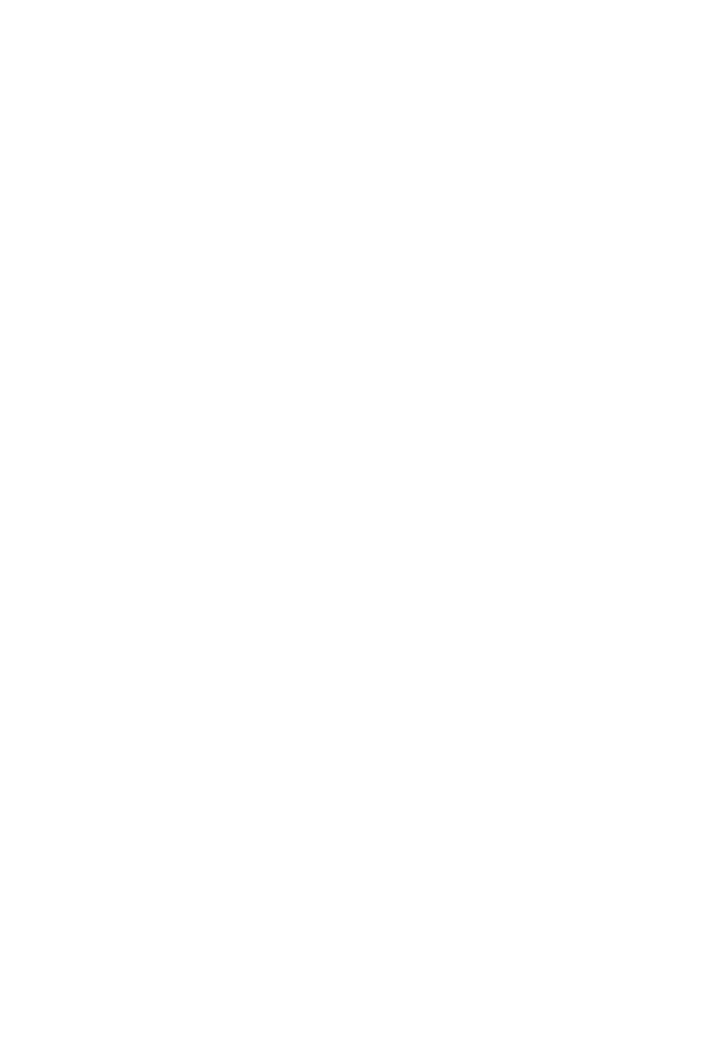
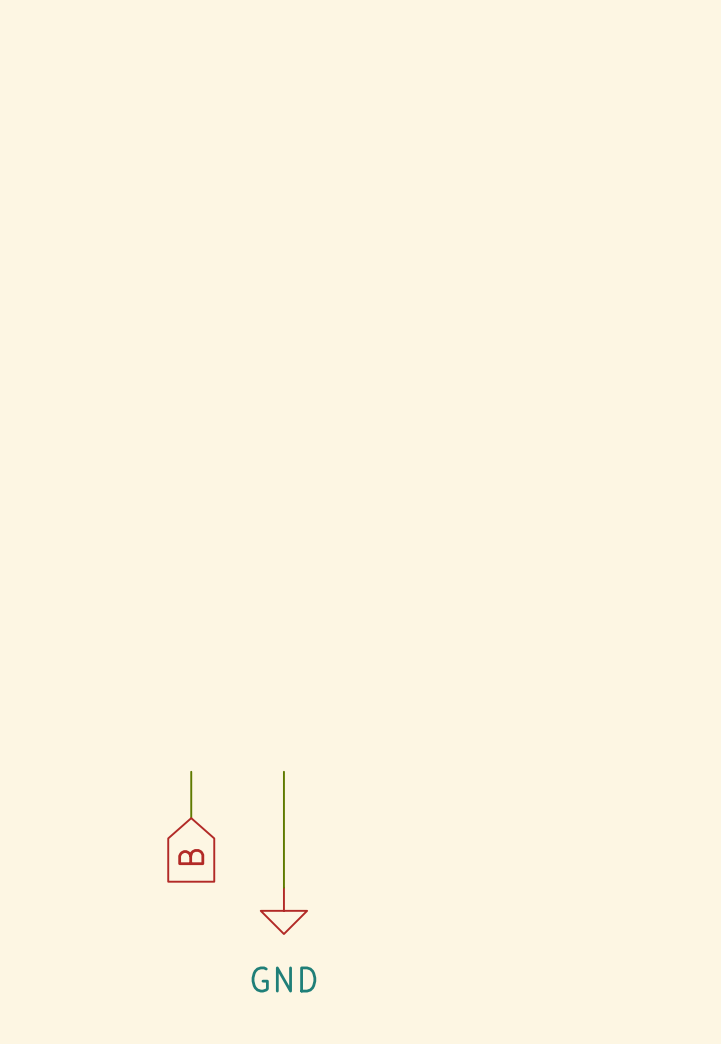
wire: none -> (191, 771) (191, 818)
wire: none -> (283, 771) (283, 887)
global label: none -> B (191, 857)
power symbol: none -> GND (283, 910)

